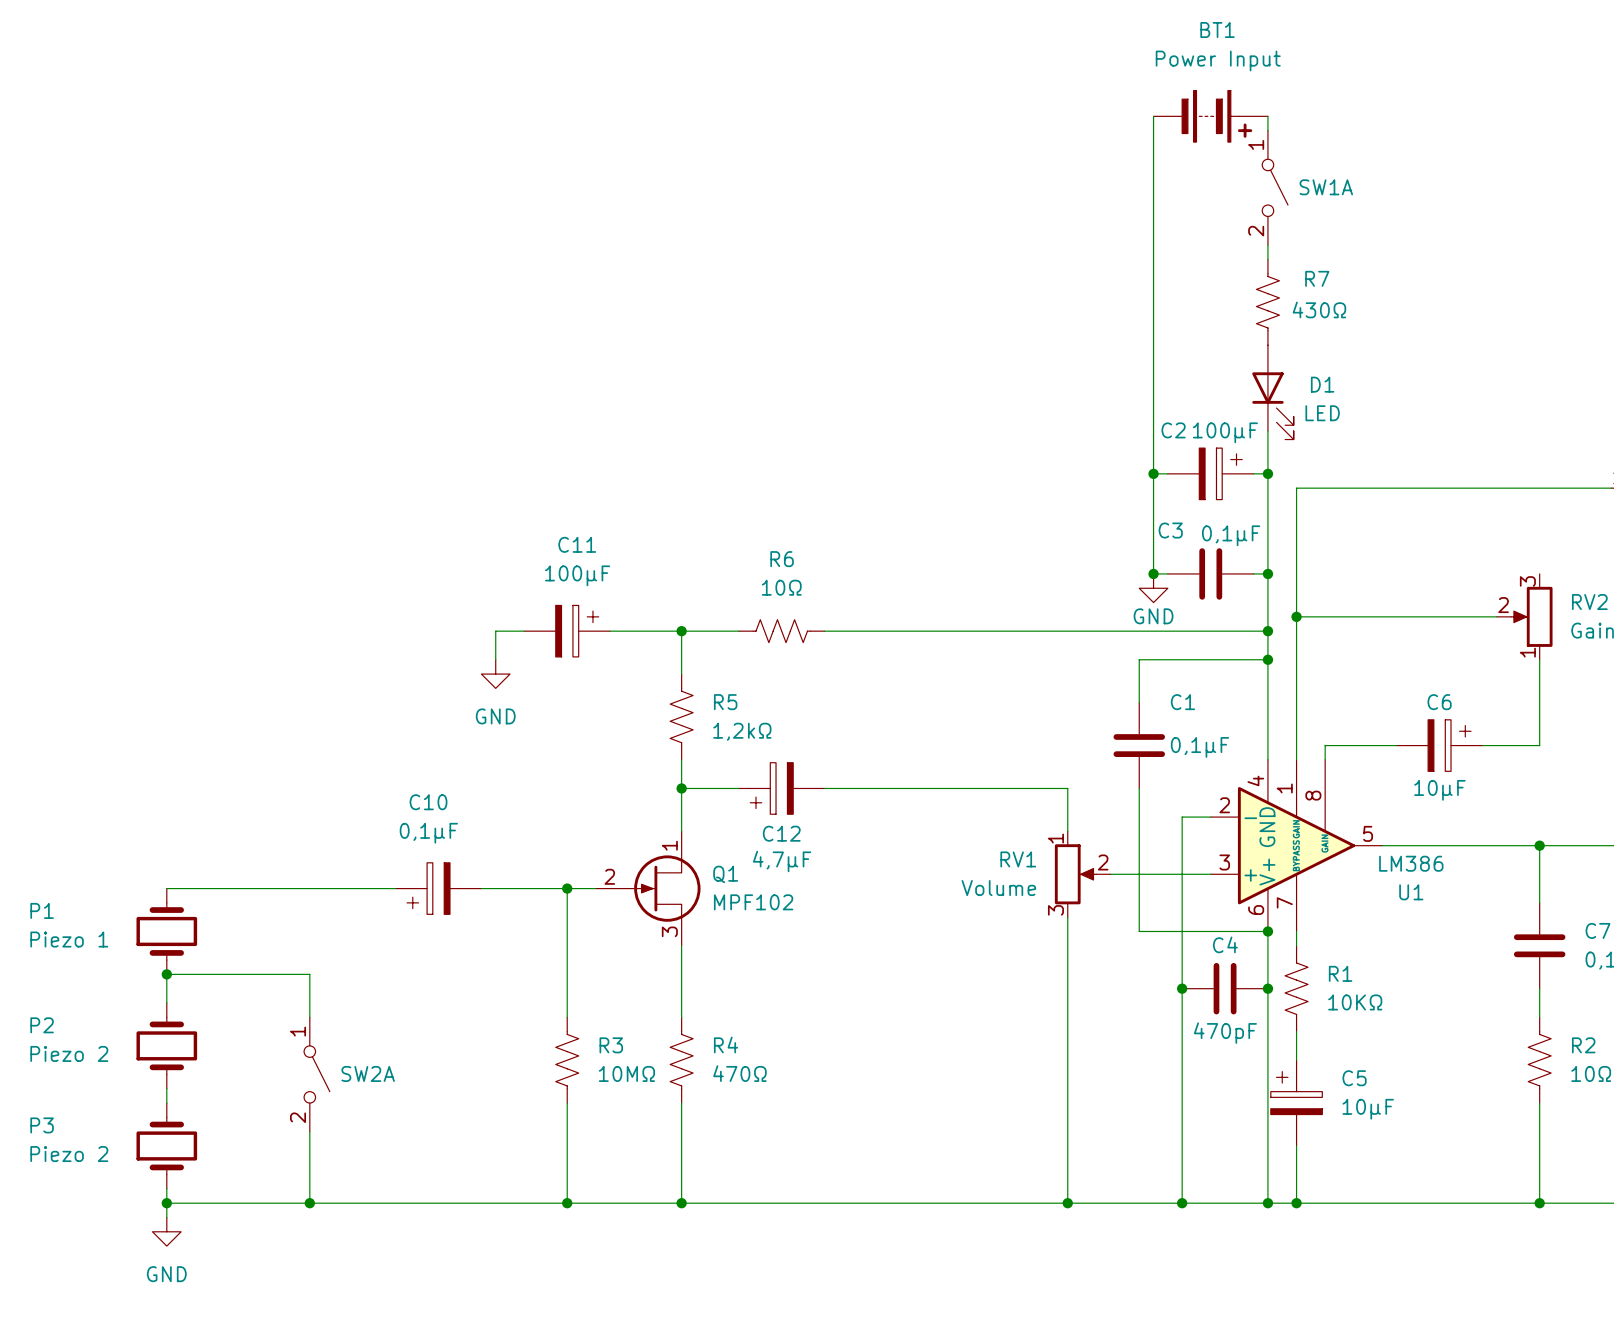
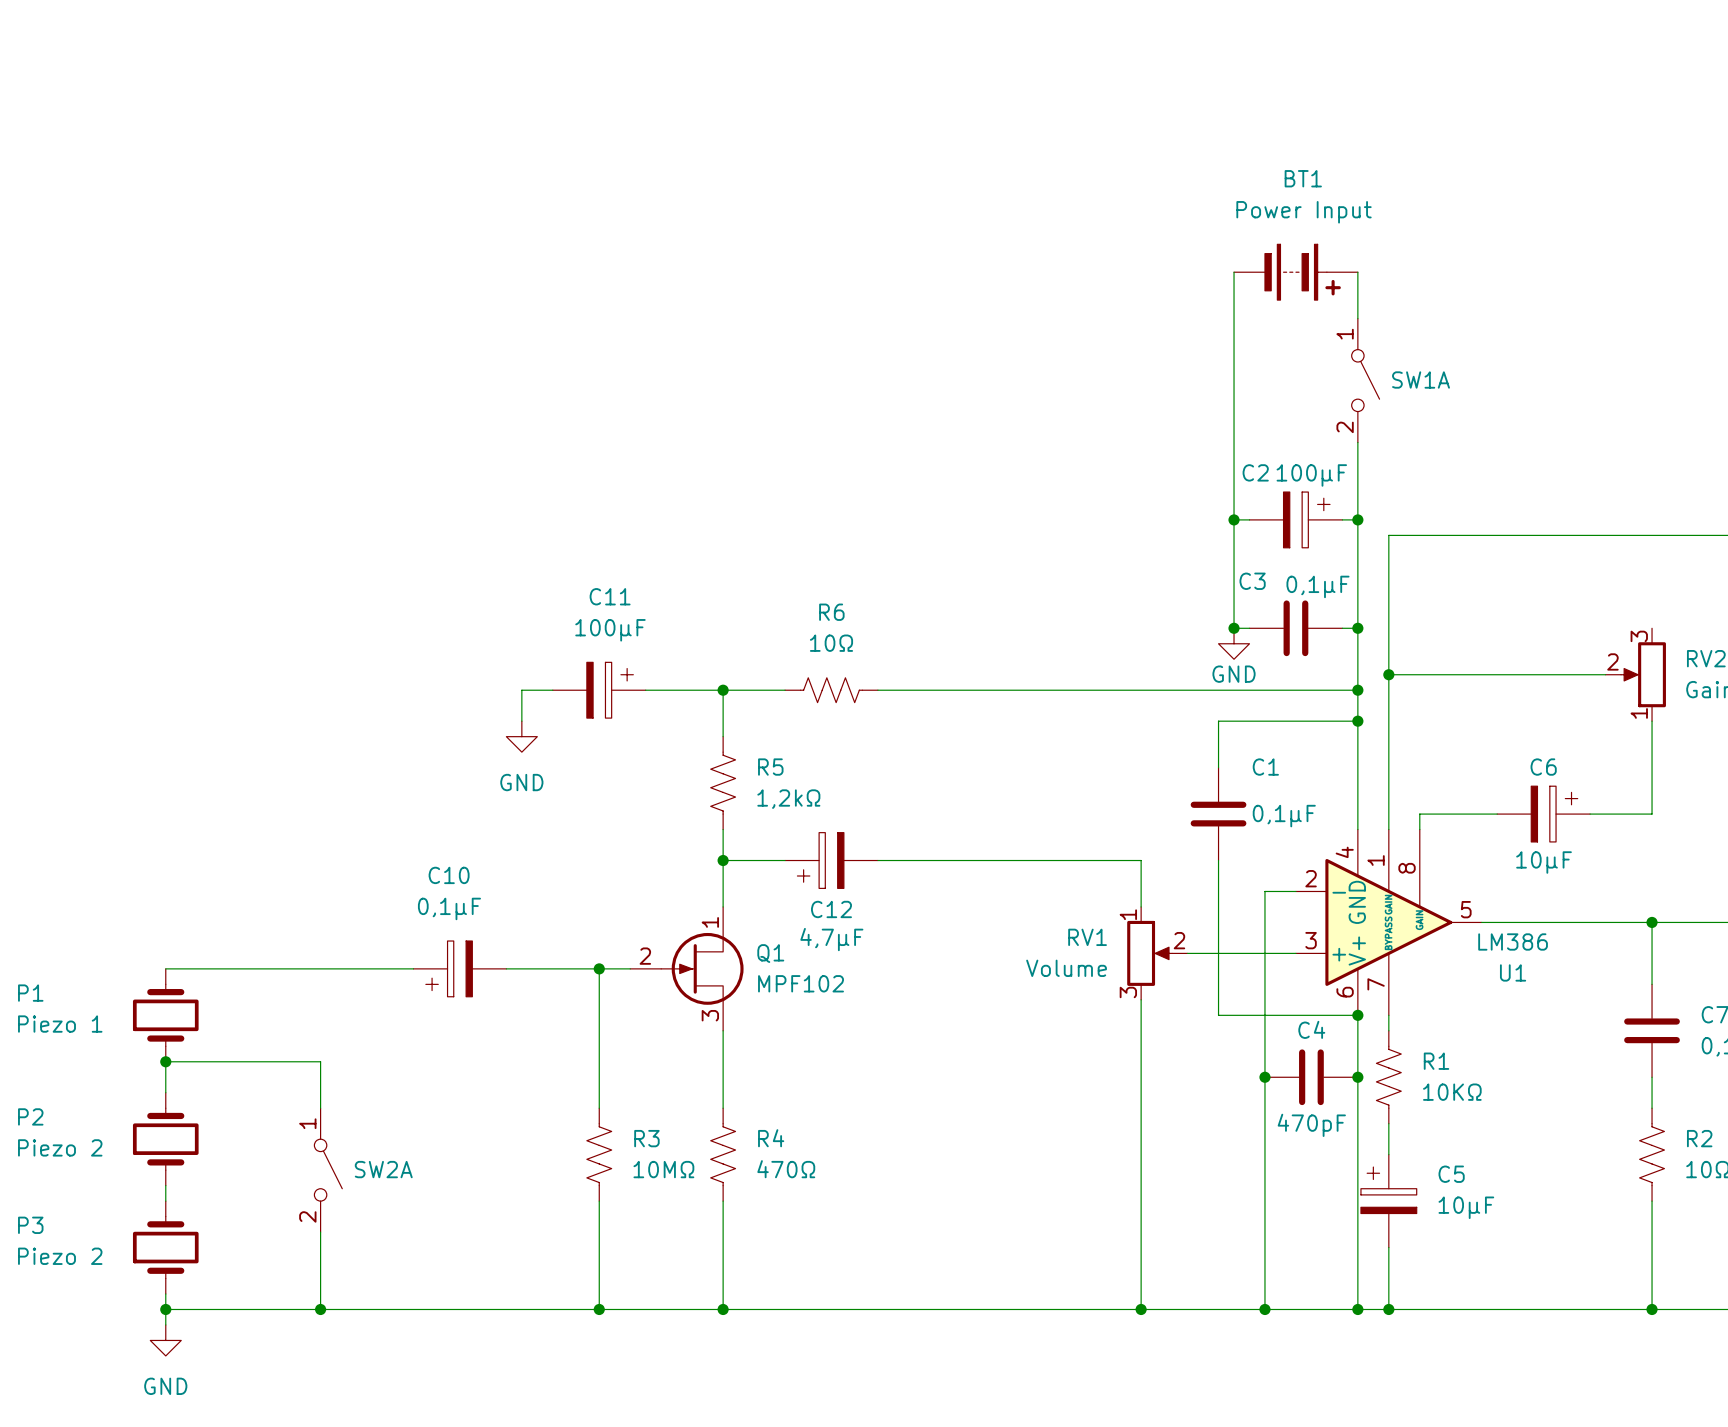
wire: (1153, 116) (1153, 245) -> none
BT1 position: (1210, 116) -> (1295, 272)
wire: (1267, 116) (1267, 130) -> none
SW1A position: (1275, 187) -> (1365, 380)
R7: 430Ω (1267, 302) -> none
D1: LED (1272, 392) -> none

